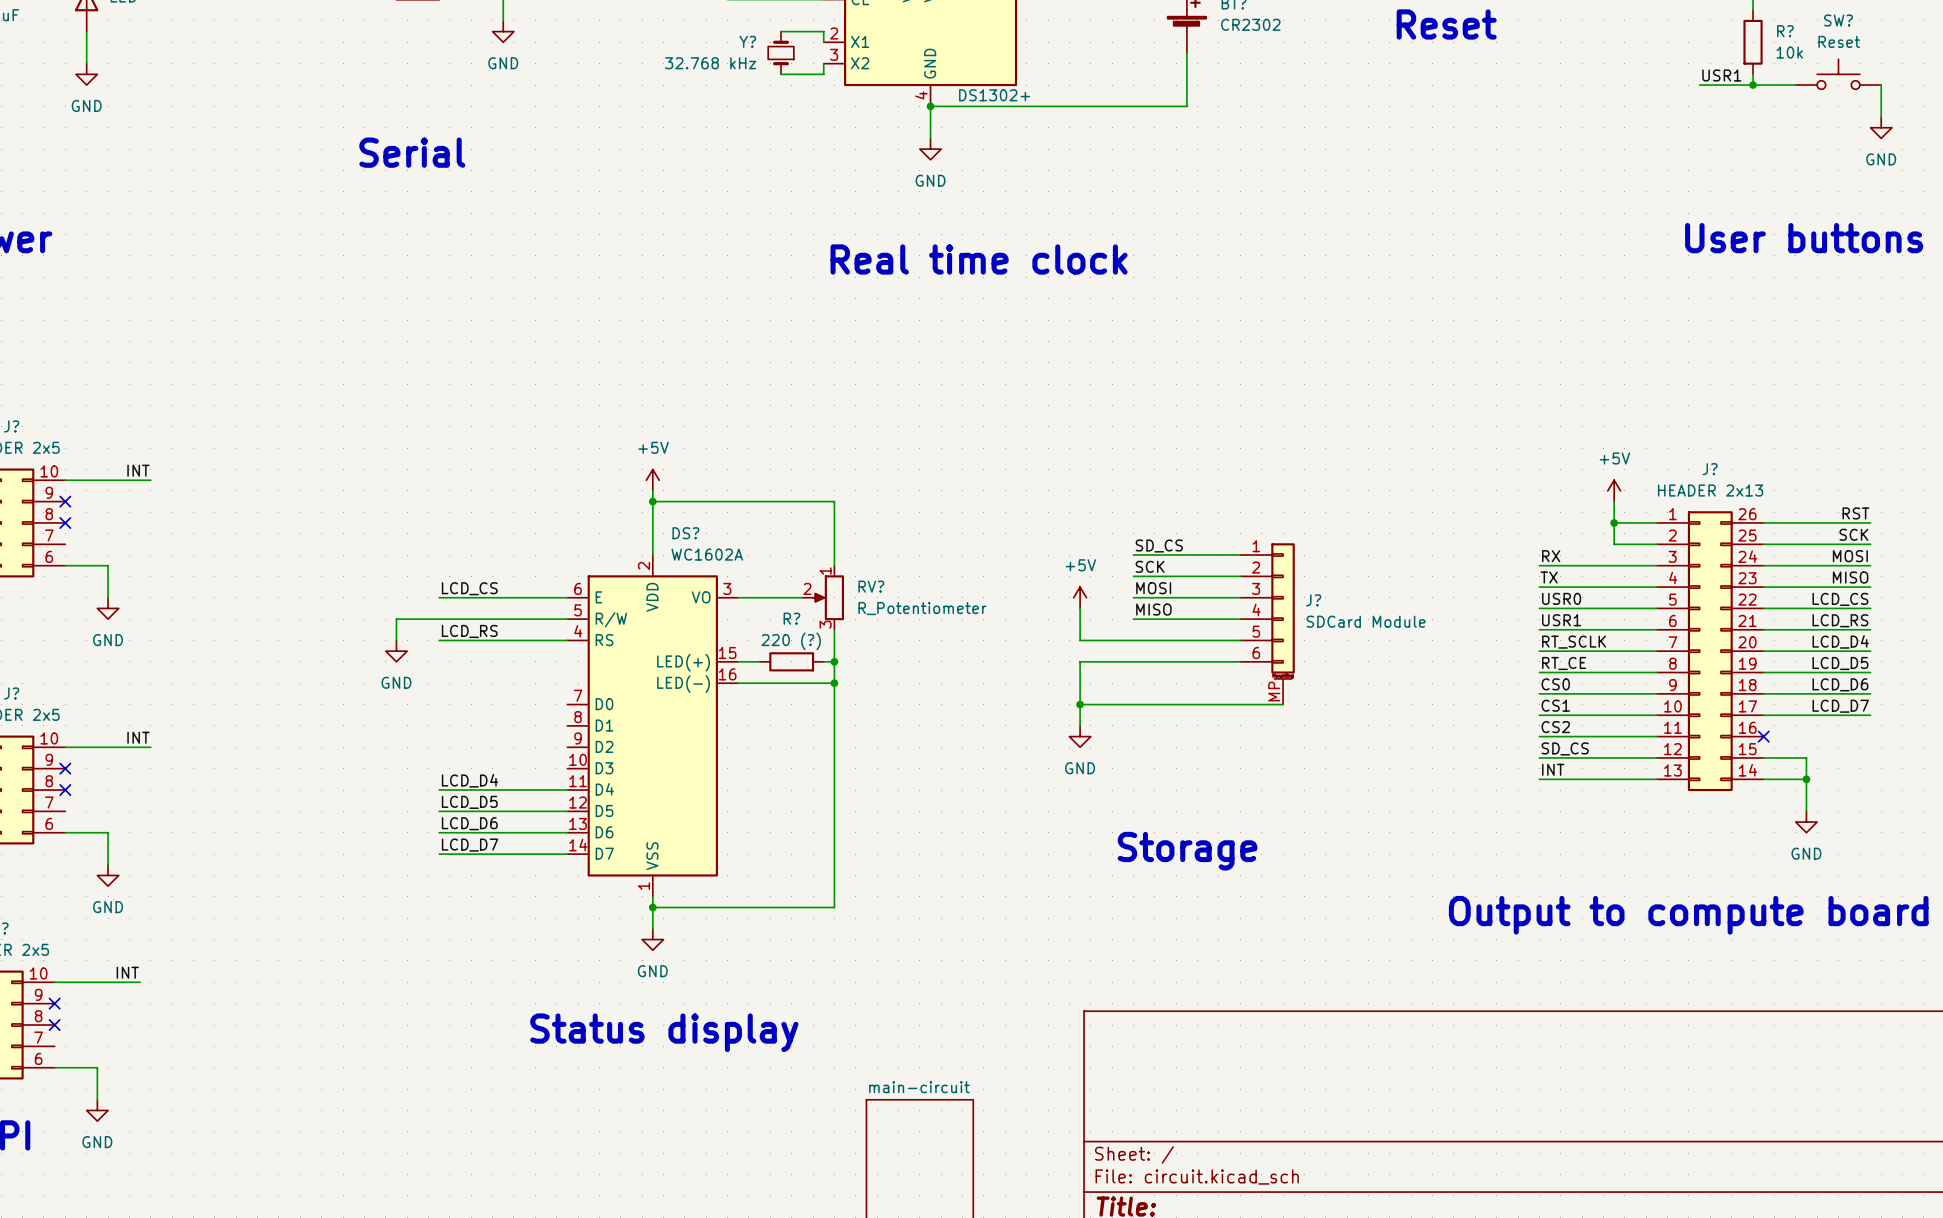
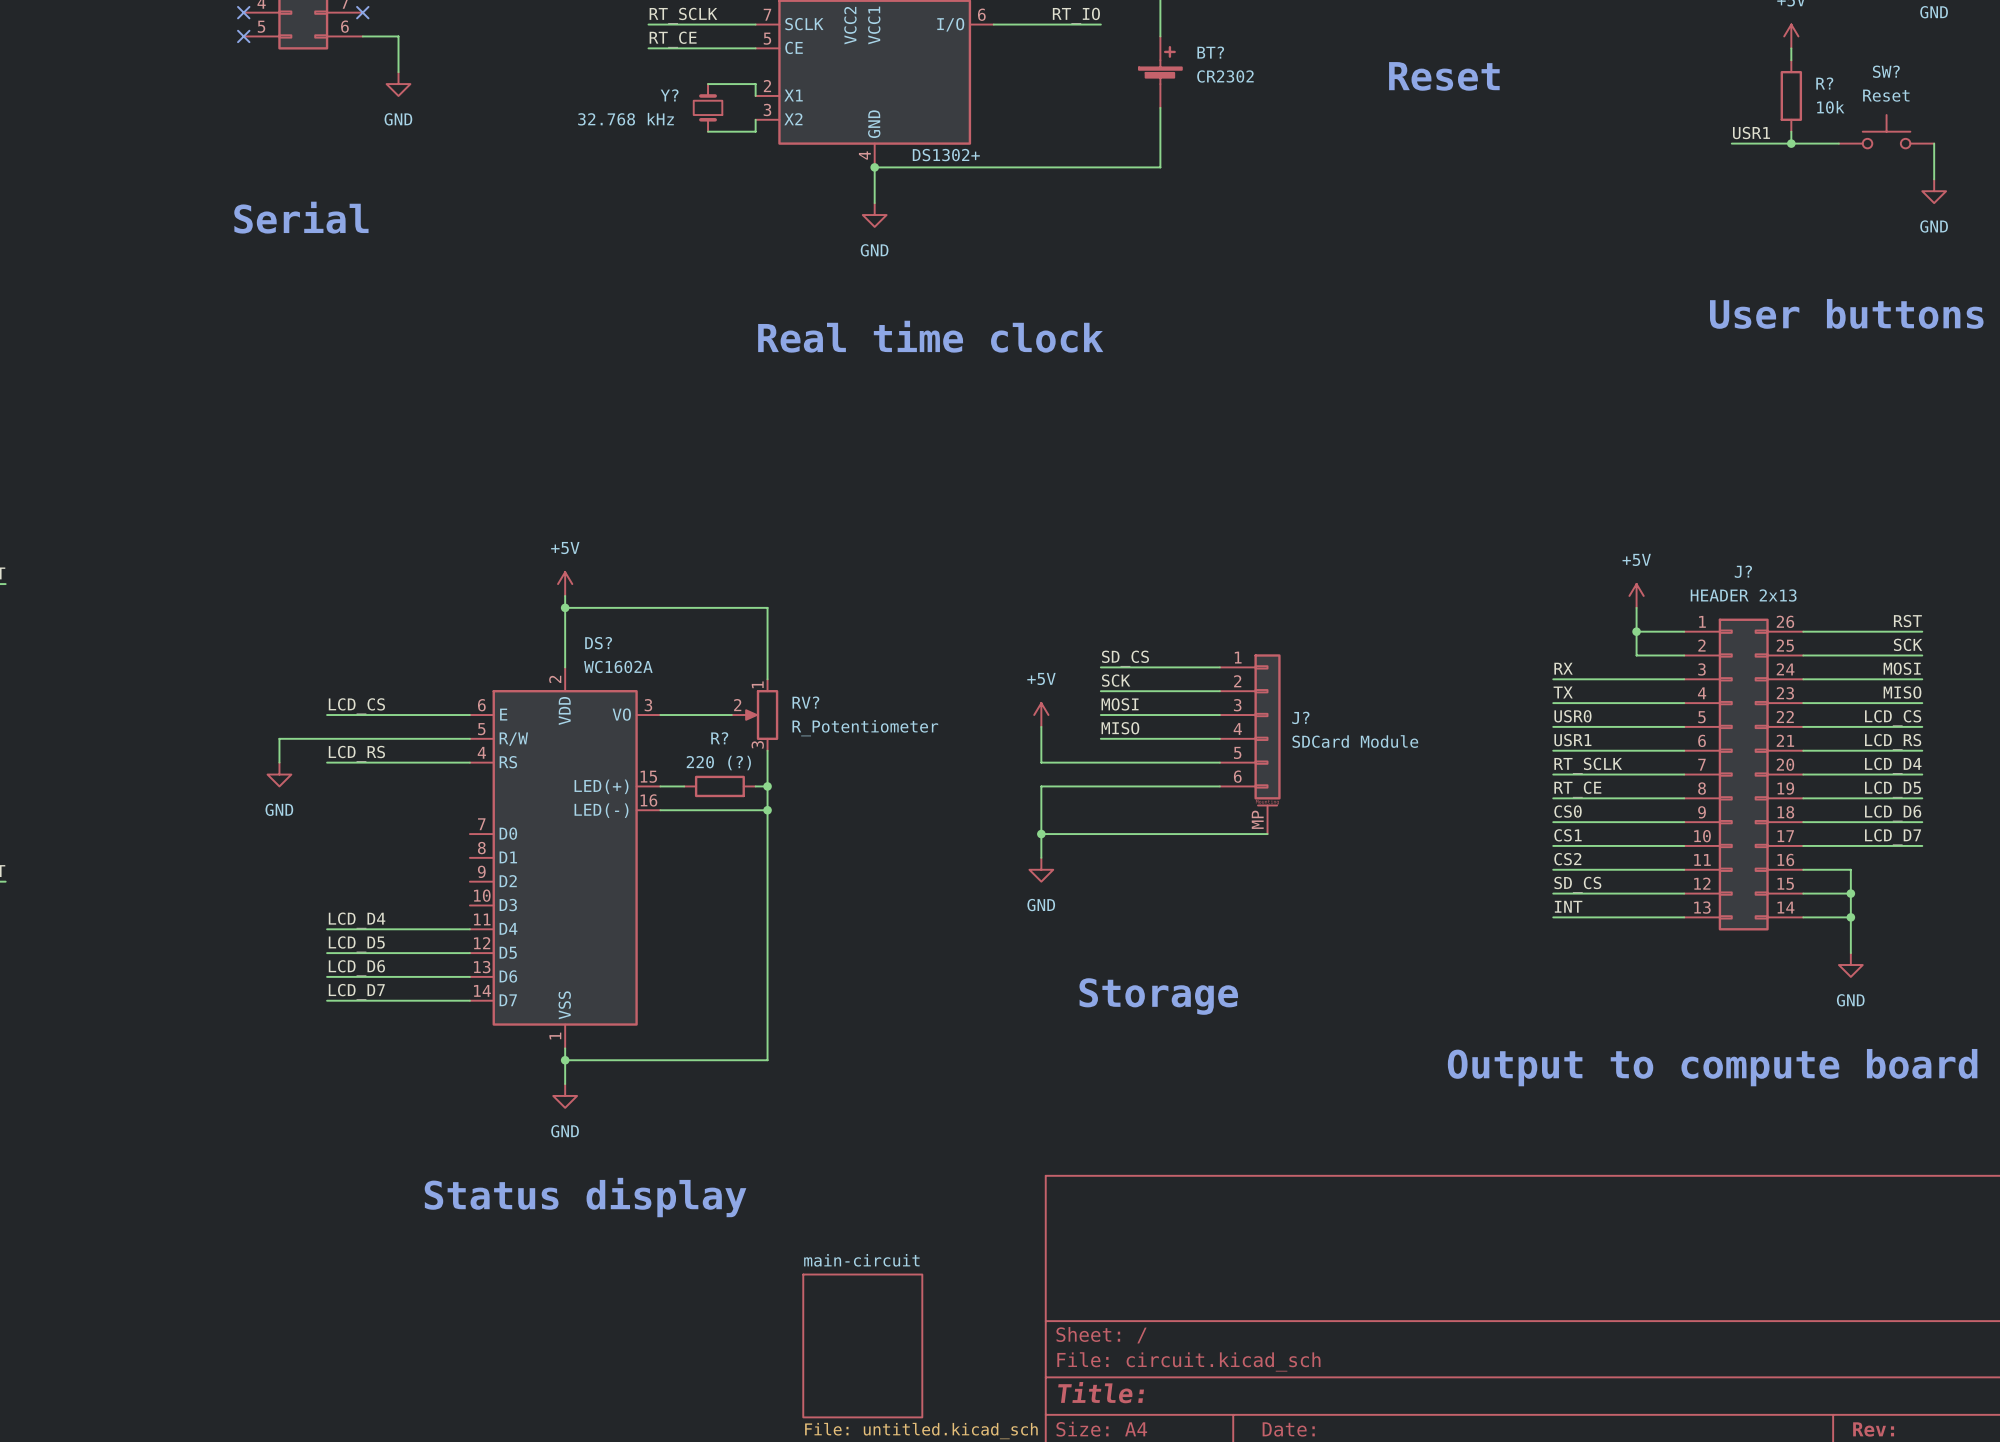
wire: none -> (1803, 869) (1850, 869) (1850, 893)
no-connect mark: (1763, 736) -> none
junction: none -> (1850, 893)

